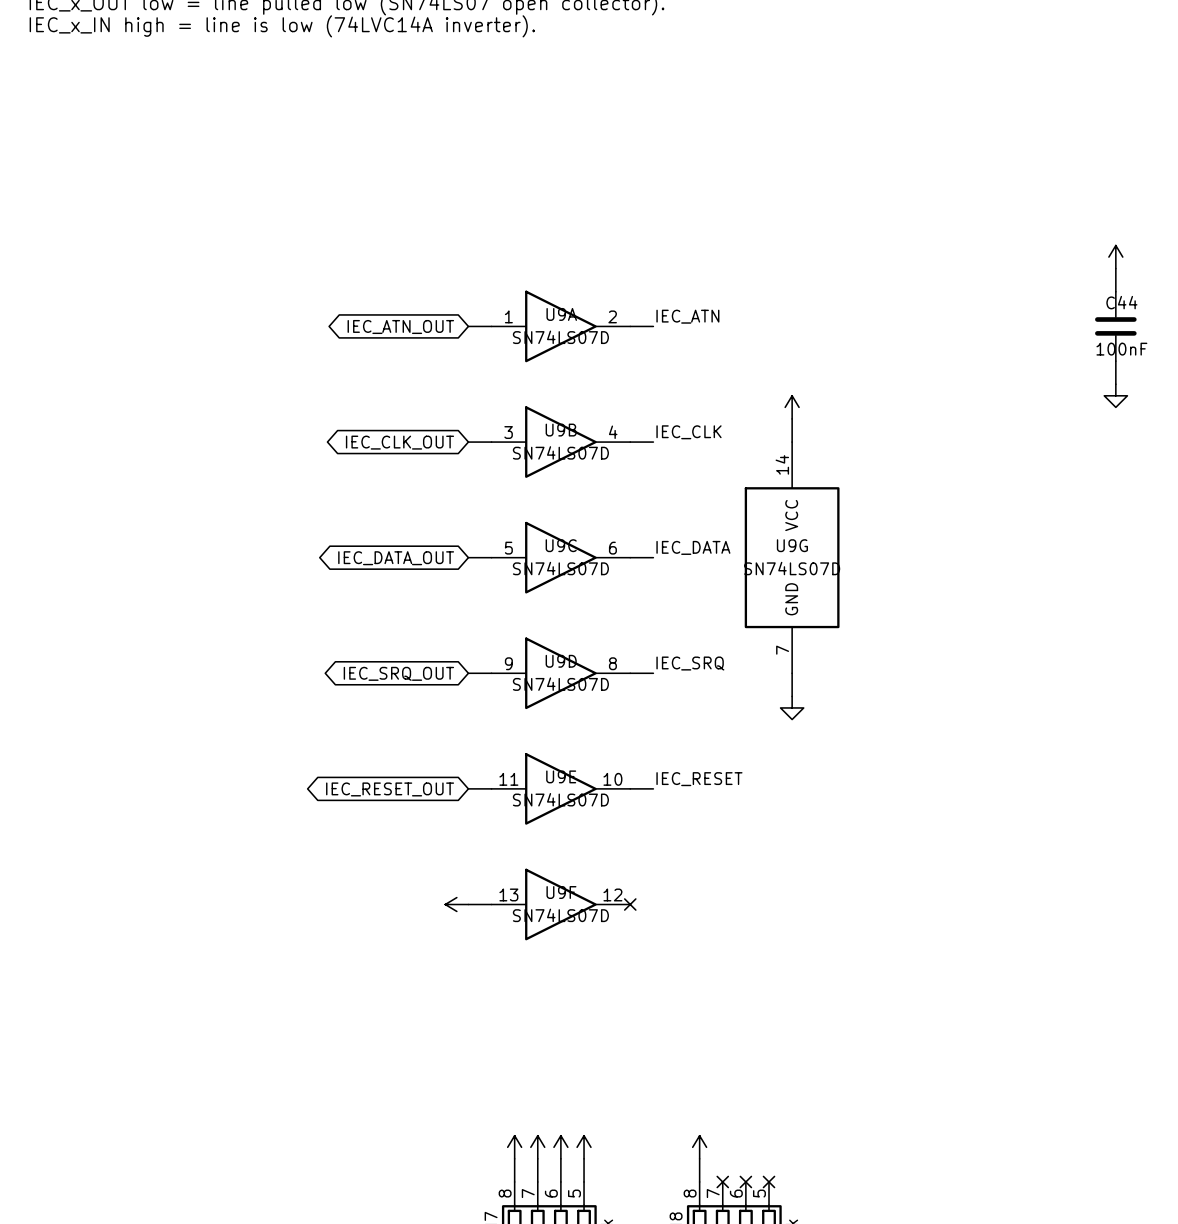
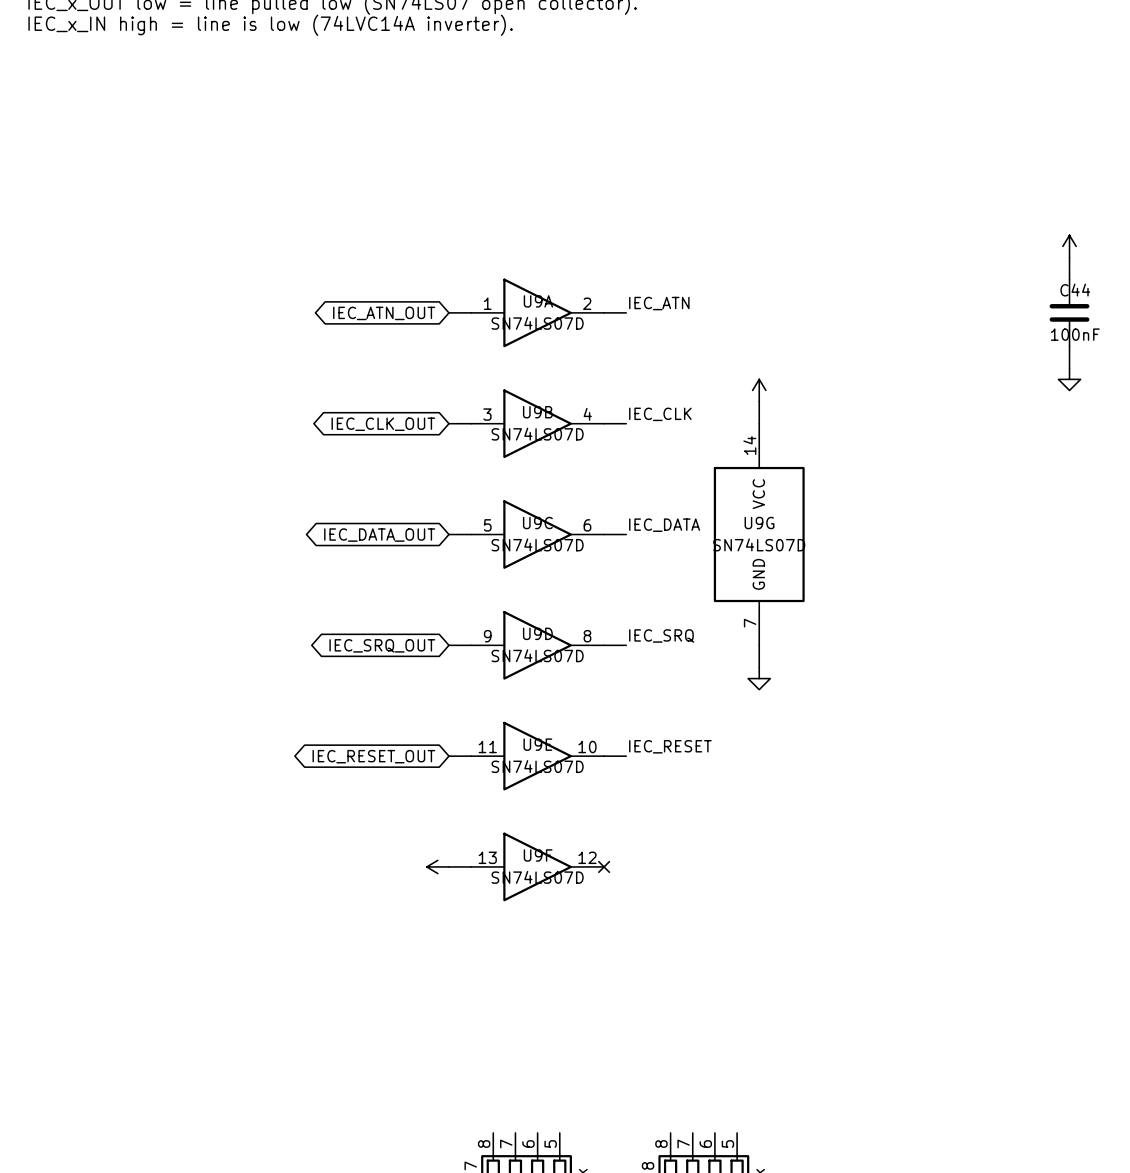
power symbol: (514, 1147) -> none
power symbol: (537, 1147) -> none
power symbol: (560, 1147) -> none
power symbol: (584, 1147) -> none
power symbol: (699, 1147) -> none
wire: (514, 1158) (514, 1181) -> none
wire: (537, 1158) (537, 1181) -> none
wire: (560, 1158) (560, 1181) -> none
wire: (584, 1158) (584, 1181) -> none
wire: (699, 1158) (699, 1181) -> none
no-connect mark: (722, 1181) -> none
no-connect mark: (745, 1181) -> none
no-connect mark: (769, 1181) -> none

